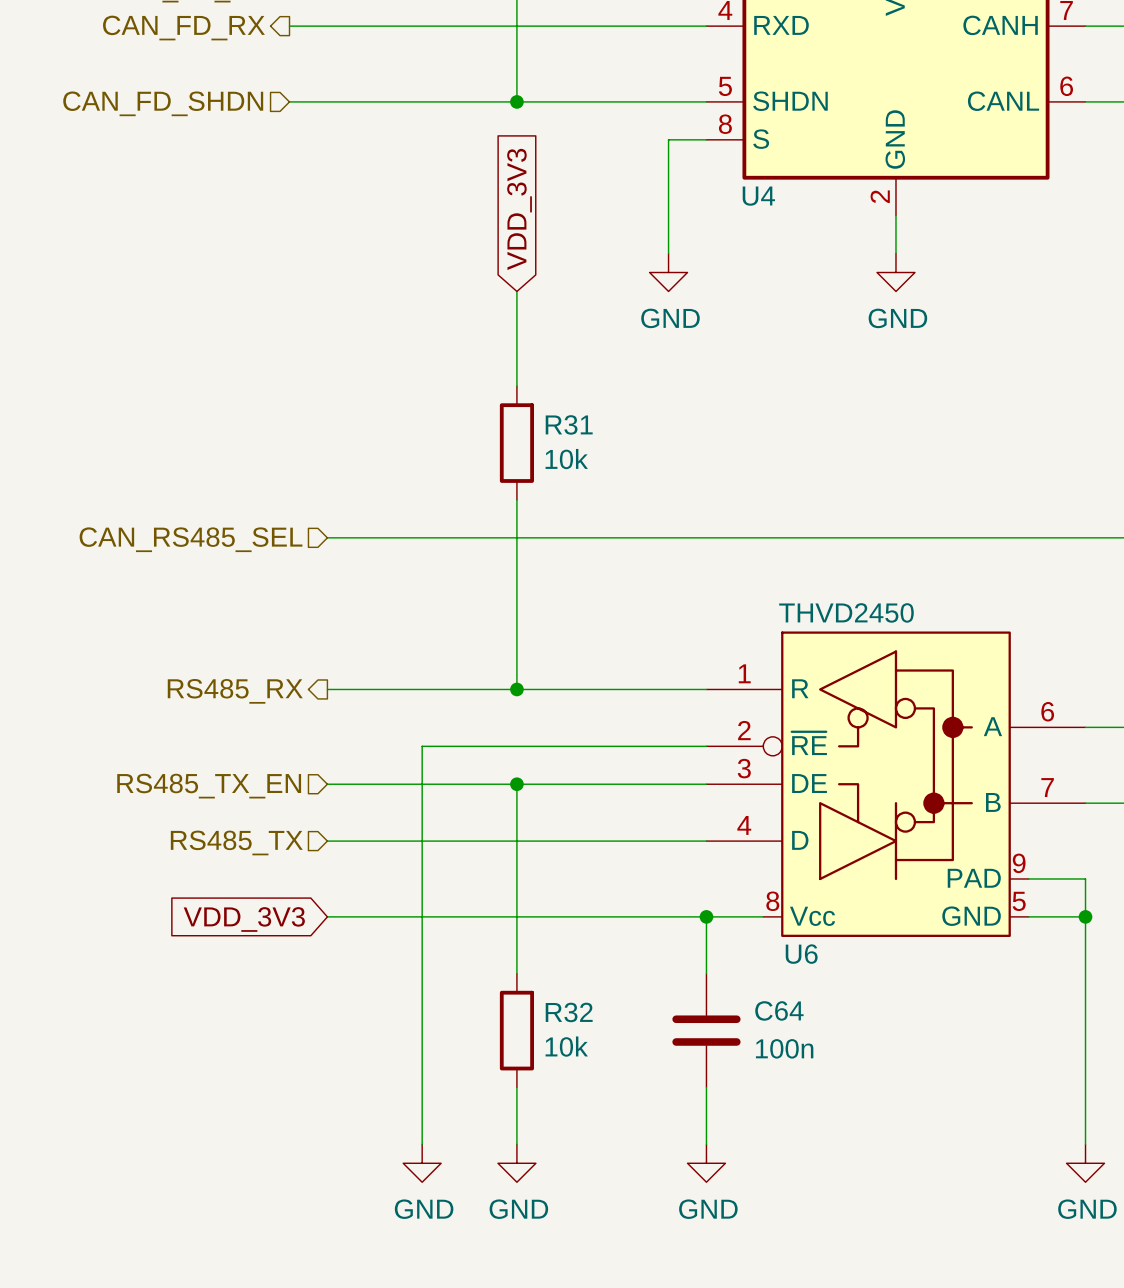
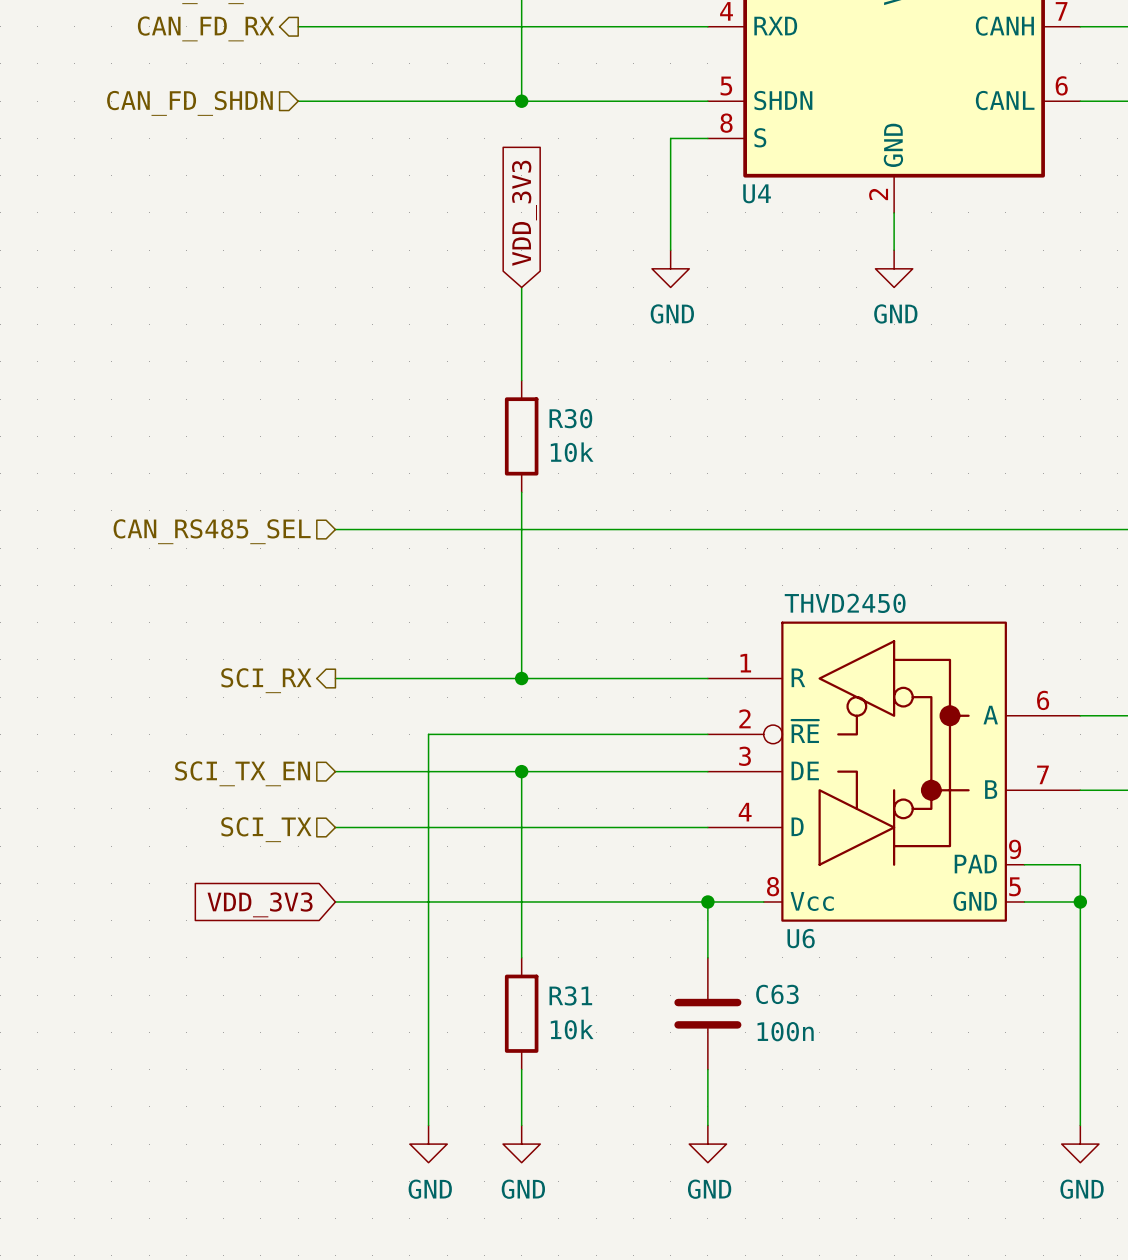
R31 name: R31 (569, 424) -> R30 (570, 418)
hierarchical label: RS485_RX (235, 691) -> SCI_RX (266, 680)
hierarchical label: RS485_TX_EN (209, 786) -> SCI_TX_EN (242, 773)
hierarchical label: RS485_TX (236, 842) -> SCI_TX (266, 829)
C64 name: C64 (779, 1010) -> C63 (777, 994)
R32 name: R32 (569, 1012) -> R31 (570, 995)

